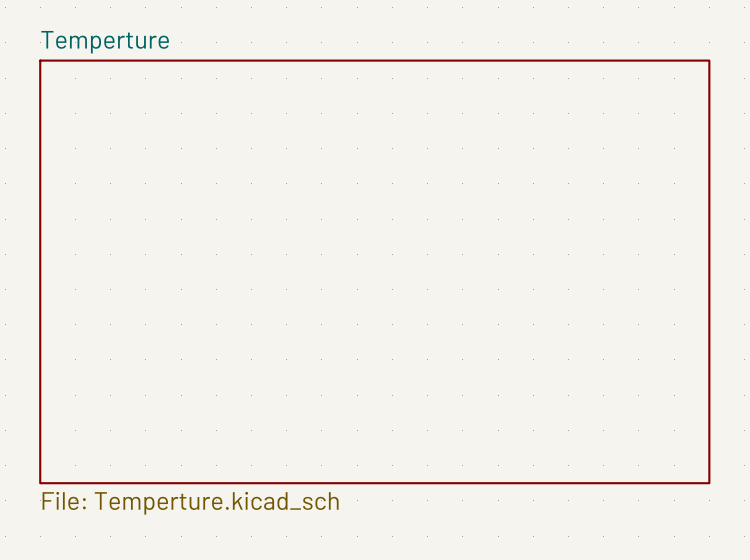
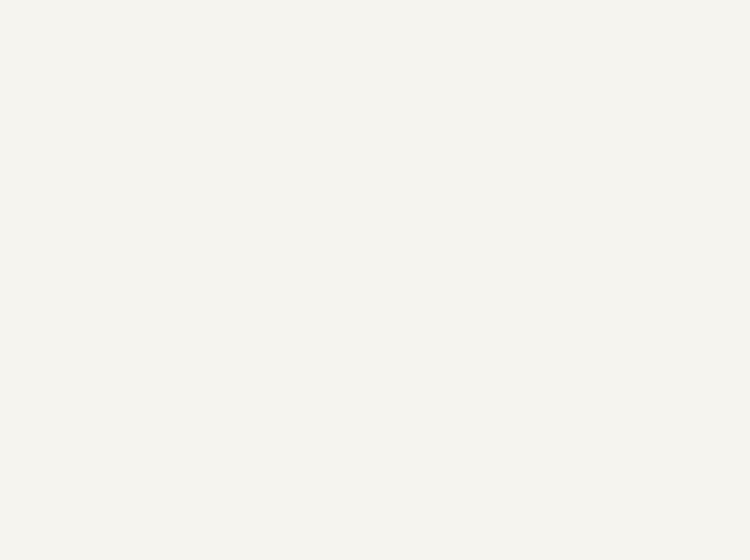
sheet Temperture: File: Temperture.kicad_sch (374, 271) -> none

